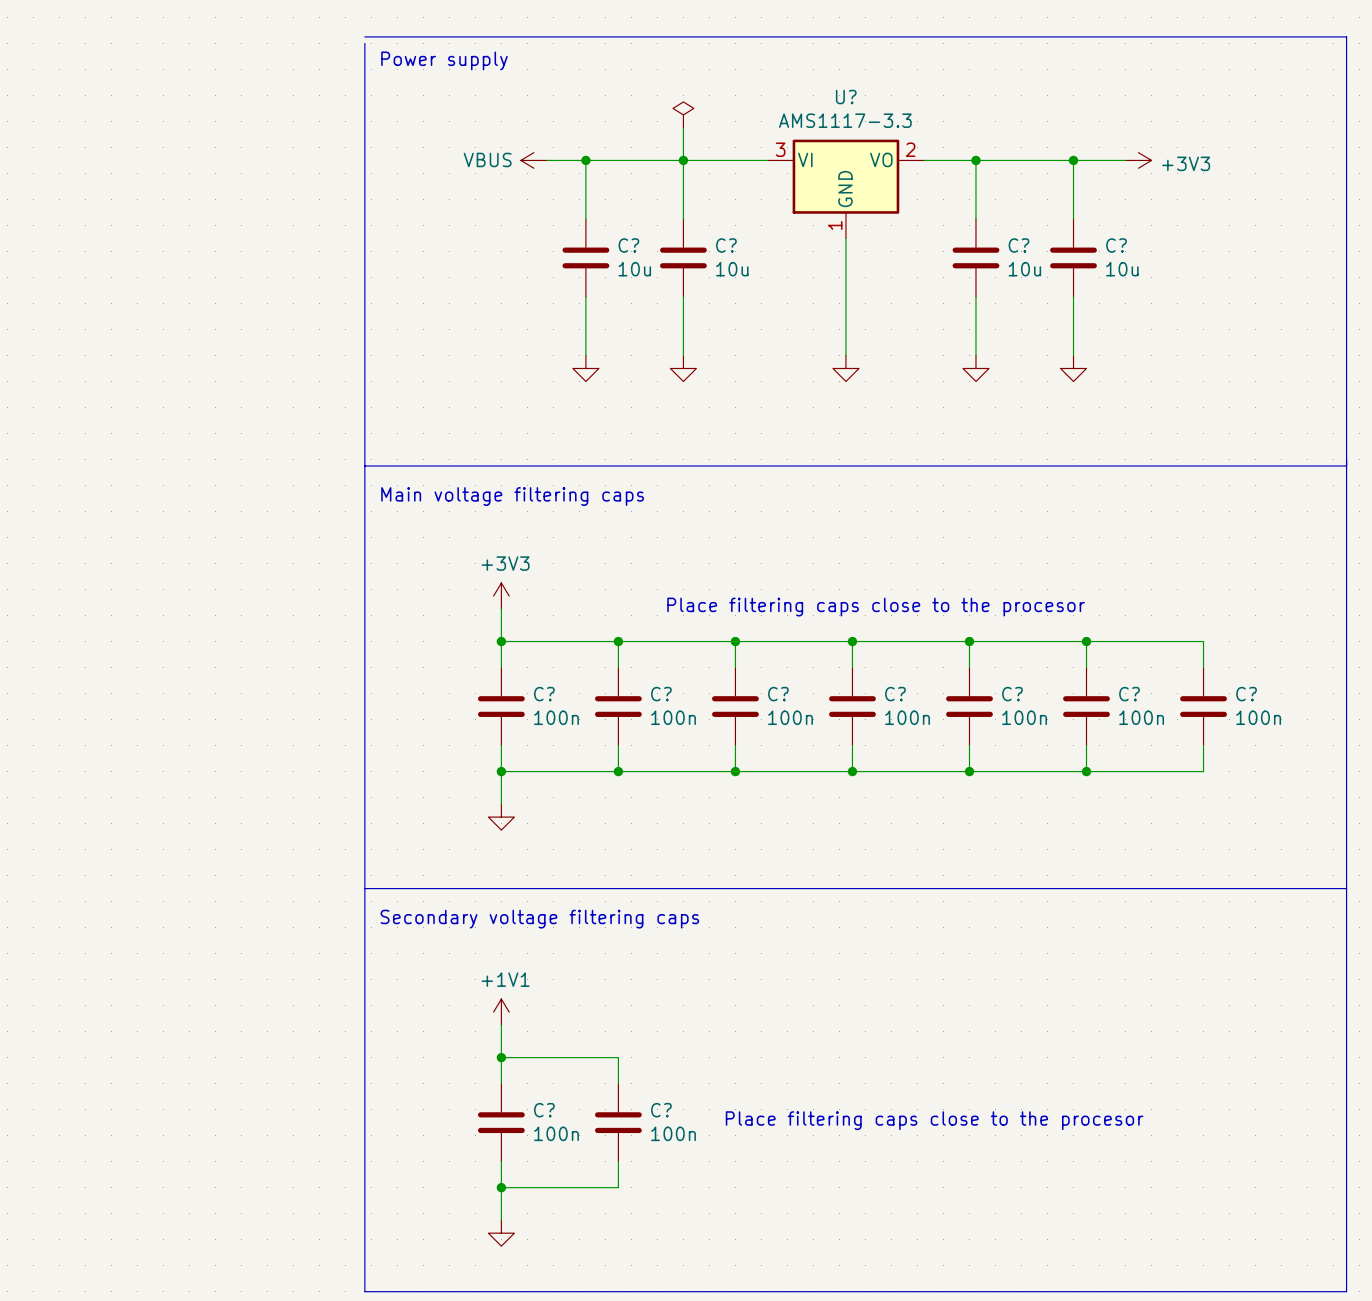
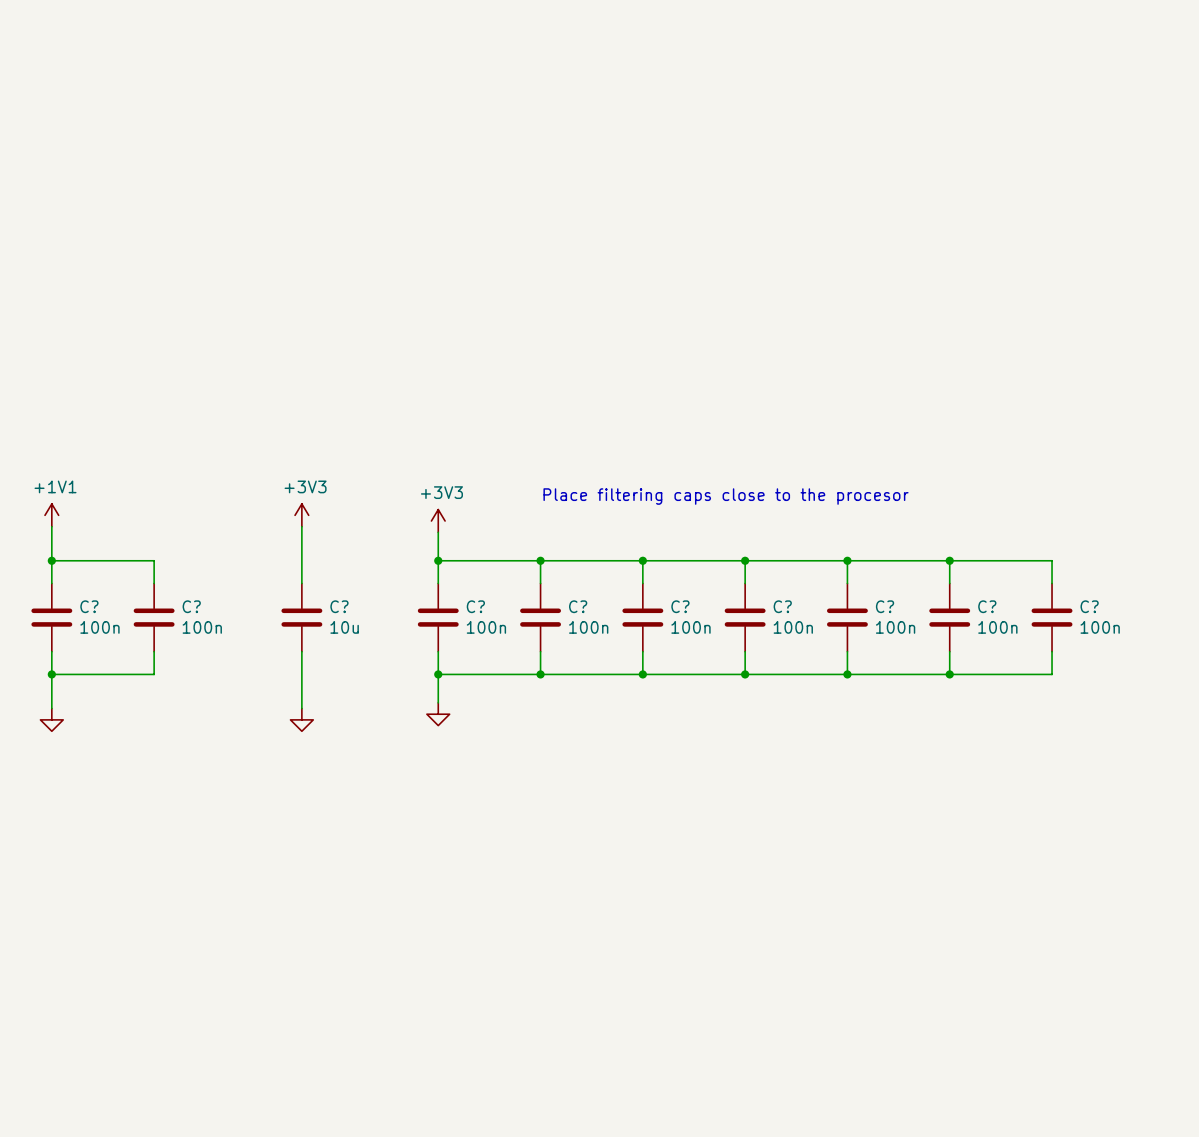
line: (364, 36) (1346, 36) (1346, 1291) (364, 1291) (364, 43) -> none
text: Power supply (444, 60) -> none
power symbol: (683, 114) -> none
wire: (683, 127) (683, 218) -> none
power symbol: VBUS (533, 160) -> none
wire: (546, 160) (767, 160) -> none
wire: (585, 160) (585, 218) -> none
junction: (585, 160) -> none
junction: (683, 160) -> none
wire: (923, 160) (1125, 160) -> none
wire: (975, 160) (975, 218) -> none
junction: (975, 160) -> none
wire: (1073, 160) (1073, 218) -> none
junction: (1073, 160) -> none
power symbol: +3V3 (1138, 160) -> none
U?: AMS1117-3.3 (845, 189) -> none
wire: (845, 238) (845, 355) -> none
C?: 10u (585, 257) -> none
C?: 10u (683, 257) -> none
C?: 10u (975, 257) -> none
C?: 10u (1073, 257) -> none
wire: (585, 296) (585, 355) -> none
wire: (683, 296) (683, 355) -> none
wire: (975, 296) (975, 355) -> none
wire: (1073, 296) (1073, 355) -> none
power symbol: (585, 368) -> none
power symbol: (683, 368) -> none
power symbol: (845, 368) -> none
power symbol: (975, 368) -> none
power symbol: (1073, 368) -> none
line: (364, 466) (1346, 466) -> none
text: Main voltage filtering caps (512, 496) -> none
power symbol: none -> +1V1 (51, 515)
power symbol: none -> +3V3 (301, 515)
wire: none -> (51, 526) (51, 583)
wire: none -> (301, 526) (301, 583)
text position: Place filtering caps close to the procesor (876, 607) -> Place filtering caps close to the procesor (726, 496)
wire: none -> (51, 560) (154, 560) (154, 583)
junction: none -> (51, 560)
C?: none -> 100n (51, 617)
C?: none -> 100n (154, 617)
C?: none -> 10u (301, 617)
wire: none -> (51, 651) (51, 708)
wire: none -> (154, 651) (154, 674) (51, 674)
wire: none -> (301, 651) (301, 708)
junction: none -> (51, 674)
power symbol: none -> (51, 719)
power symbol: none -> (301, 719)
line: (364, 888) (1346, 888) -> none
text: Secondary voltage filtering caps (539, 919) -> none
power symbol: +1V1 (501, 1012) -> none
wire: (501, 1025) (501, 1083) -> none
wire: (501, 1057) (618, 1057) (618, 1083) -> none
junction: (501, 1057) -> none
text: Place filtering caps close to the procesor (934, 1120) -> none
C?: 100n (501, 1122) -> none
C?: 100n (618, 1122) -> none
wire: (501, 1161) (501, 1220) -> none
wire: (618, 1161) (618, 1187) (501, 1187) -> none
junction: (501, 1187) -> none
power symbol: (501, 1233) -> none

